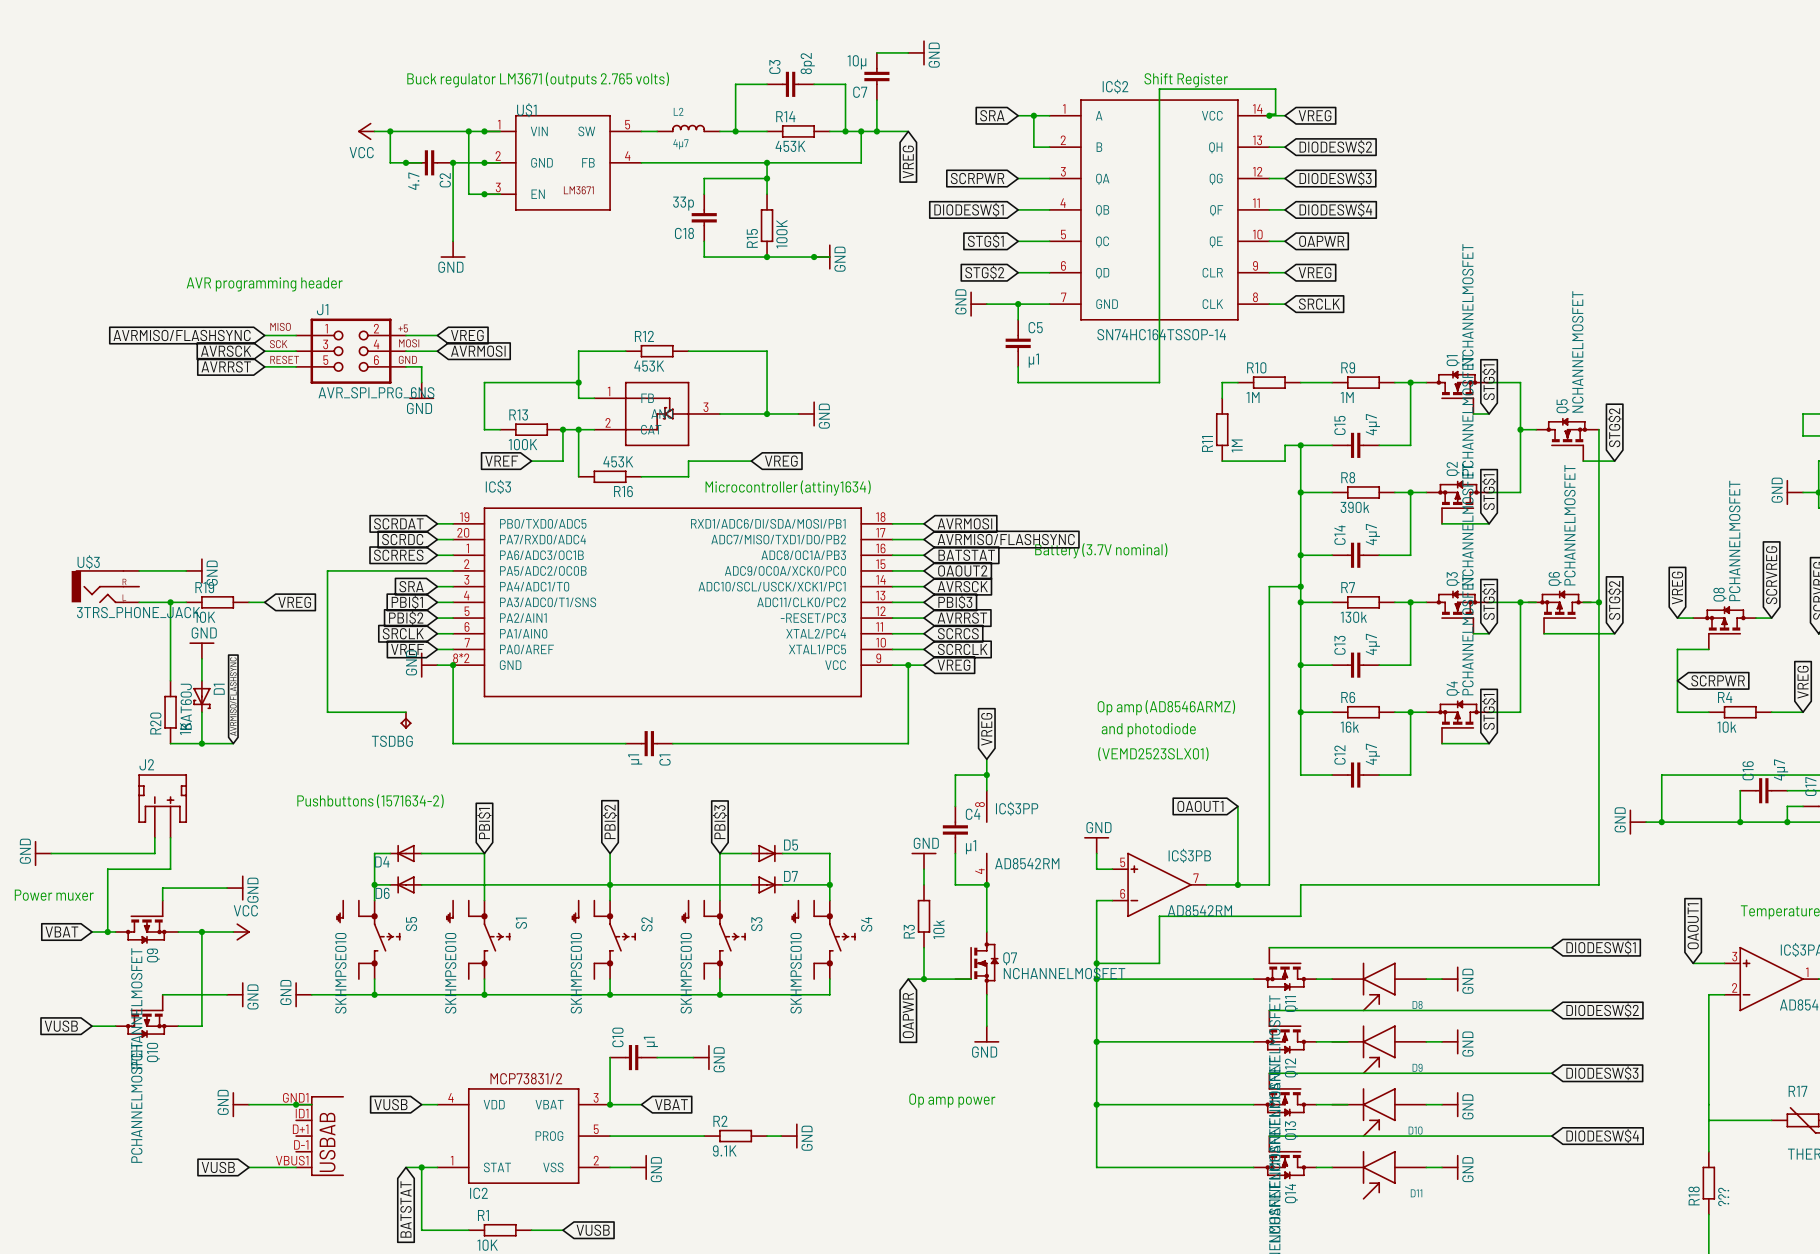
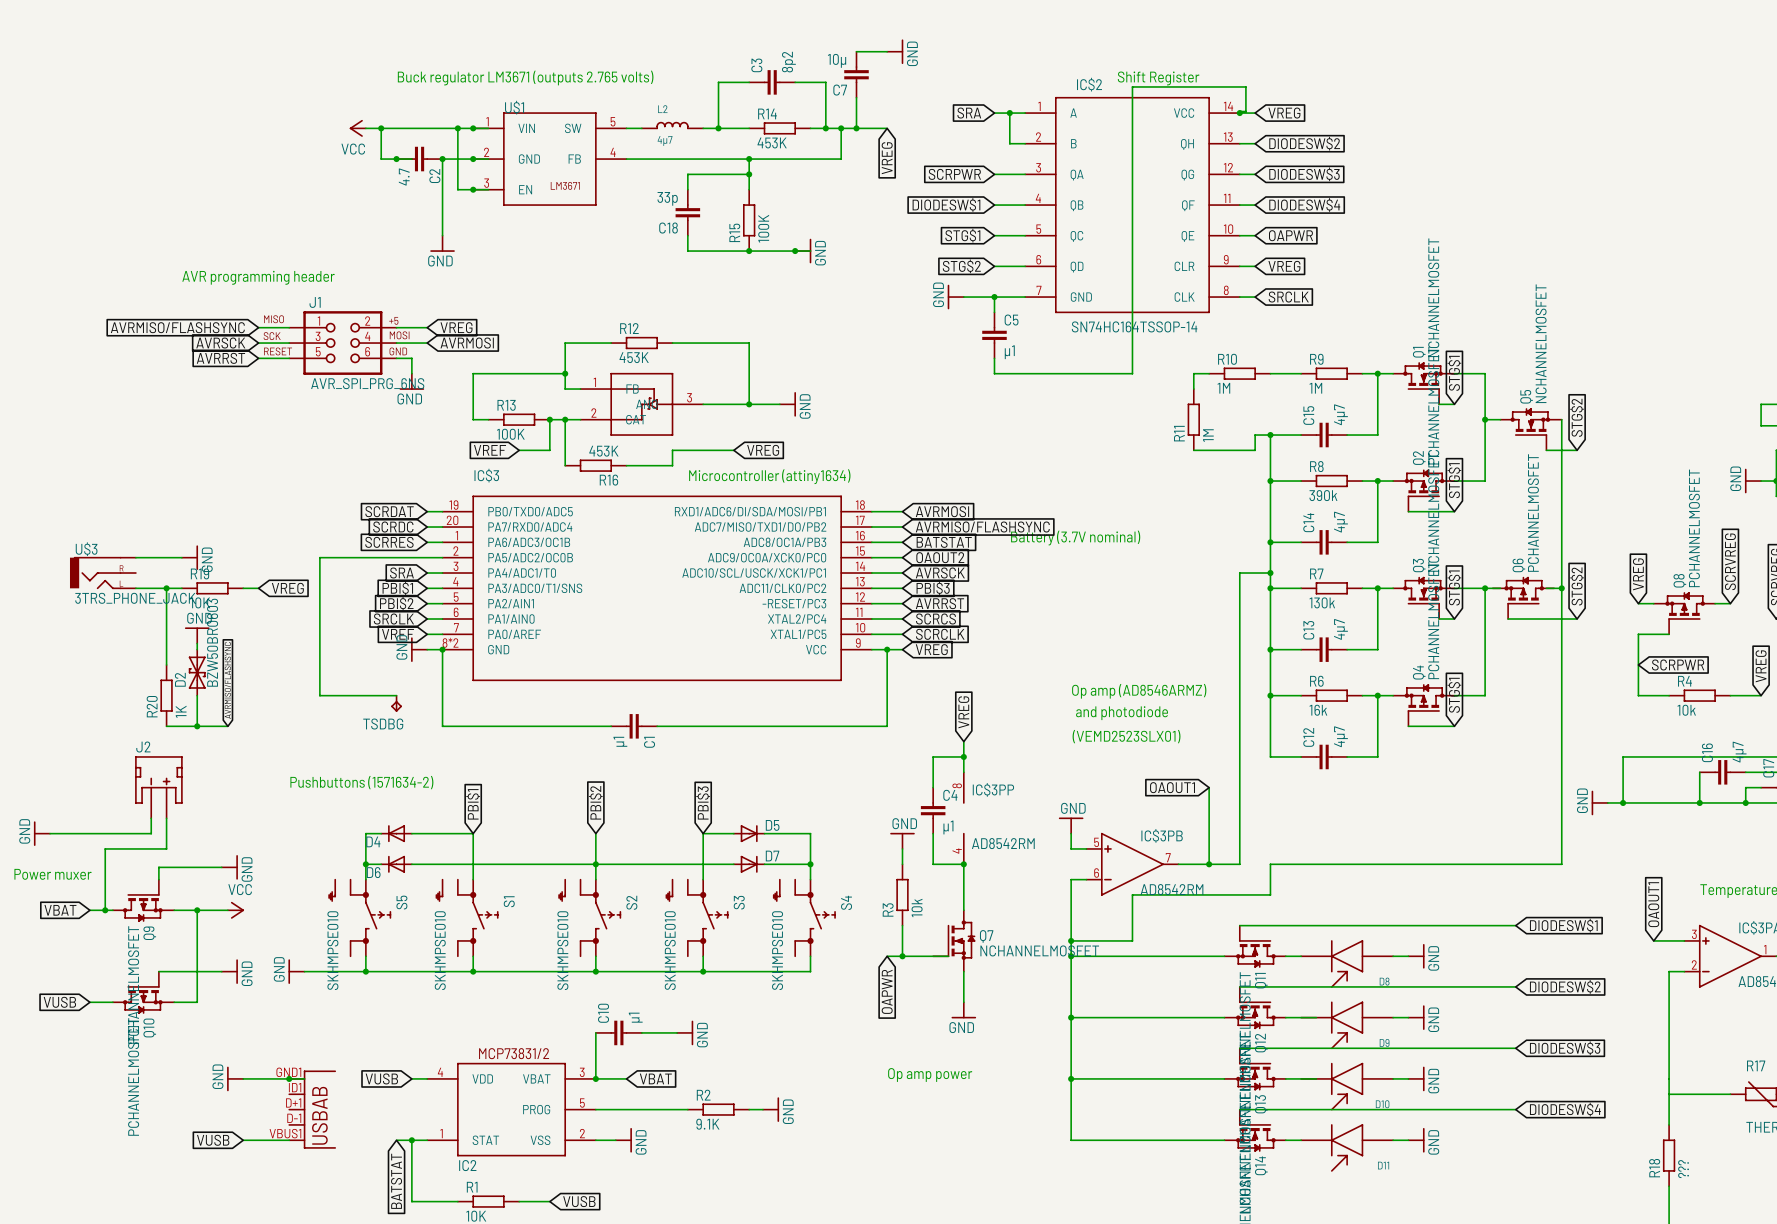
D2: none -> BZW50BR0603 (197, 672)
D1: BAT60J (201, 696) -> none

